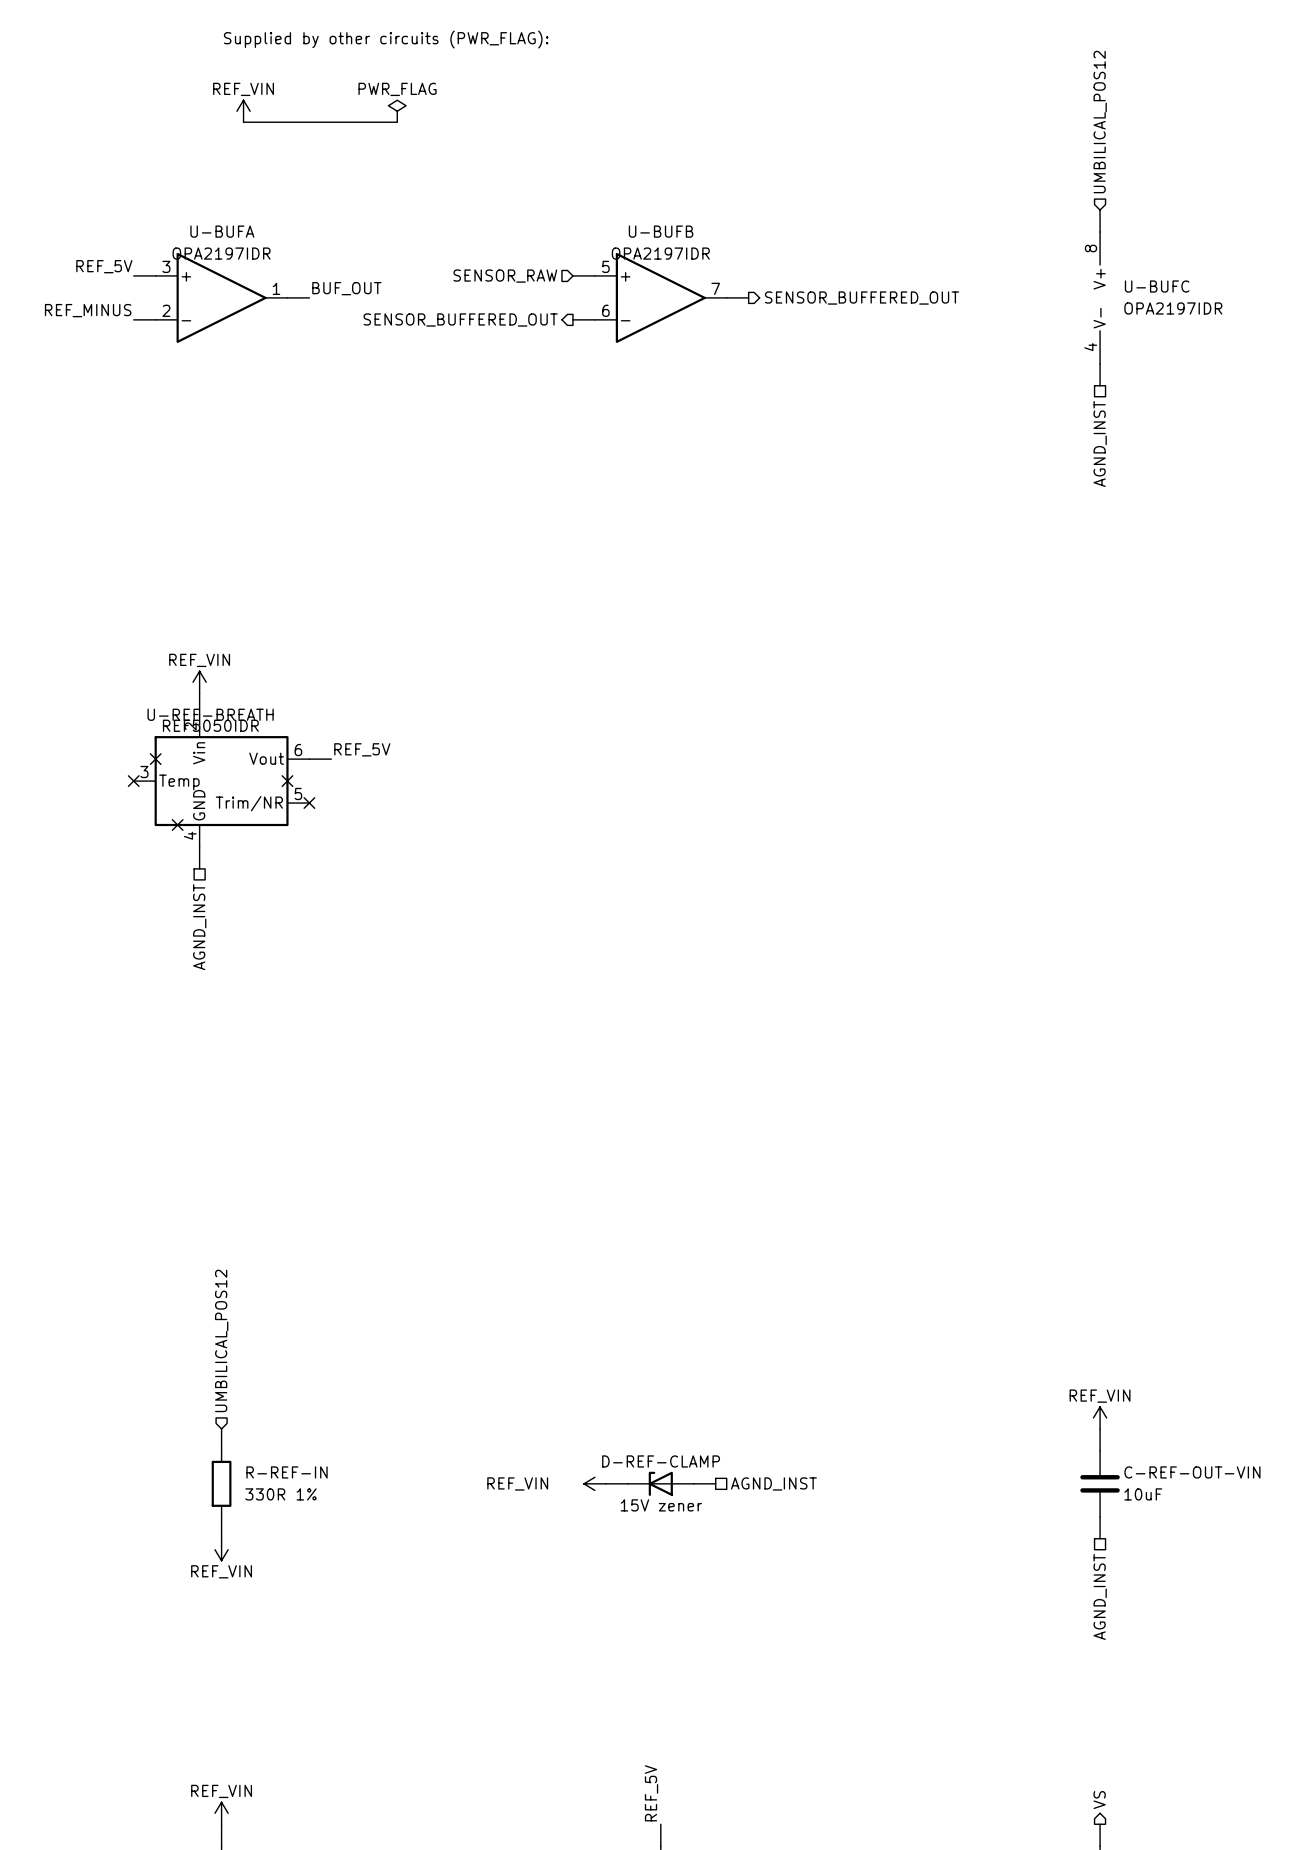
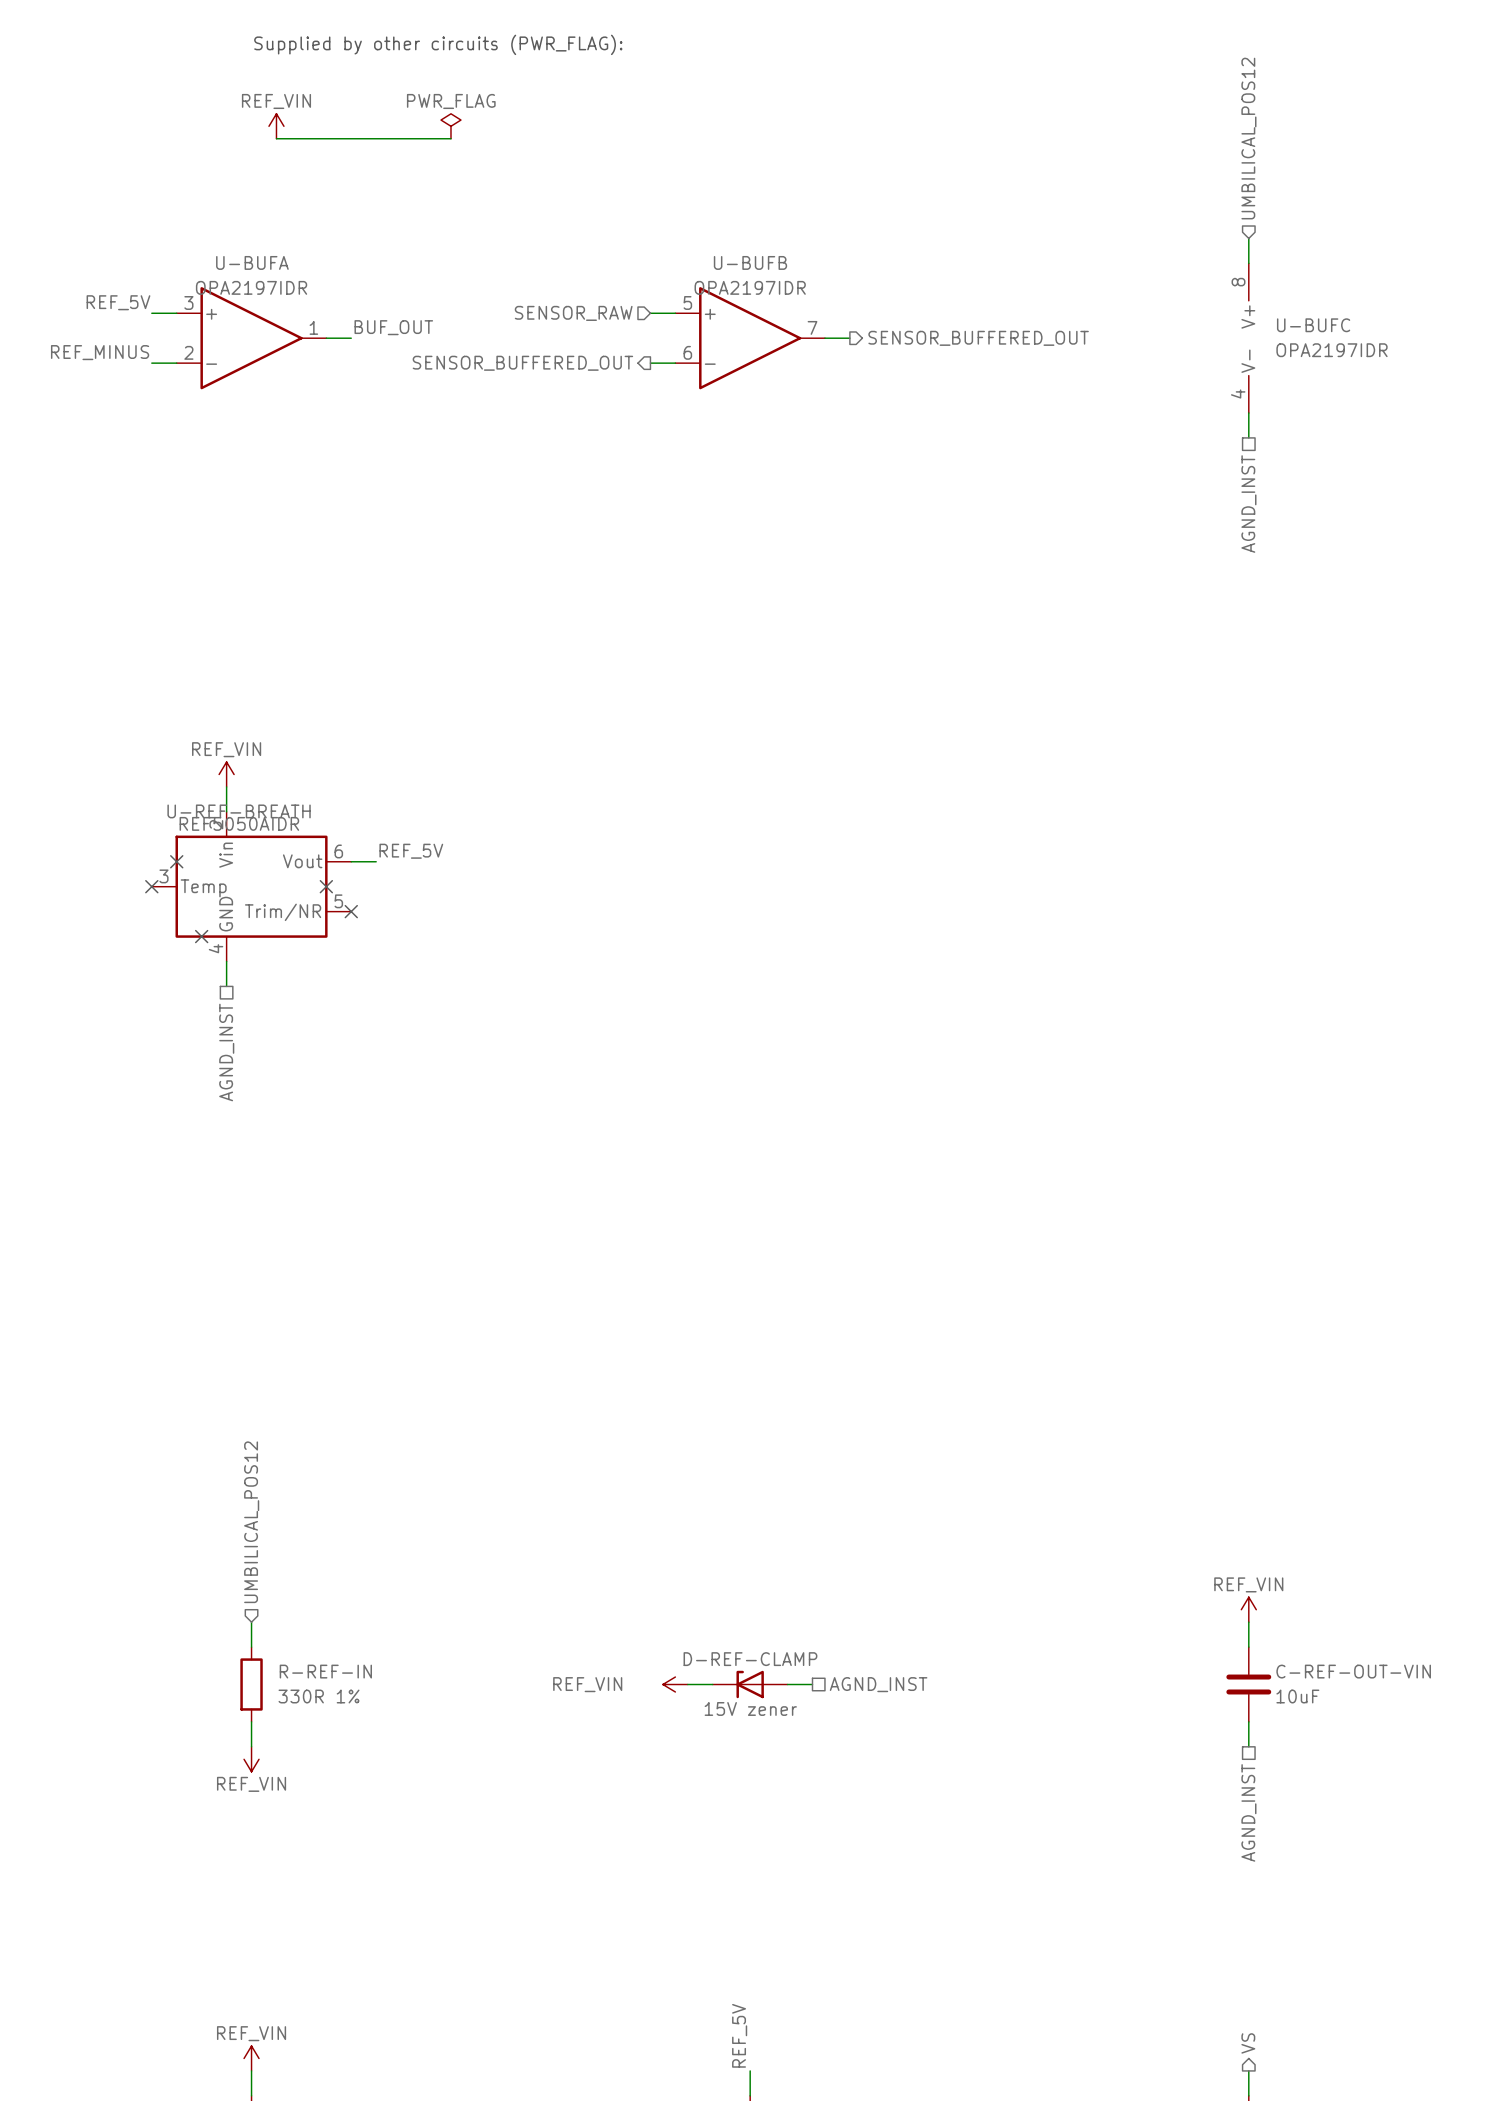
U-REF-BREATH value: REF5050IDR (210, 725) -> REF5050AIDR (239, 823)

